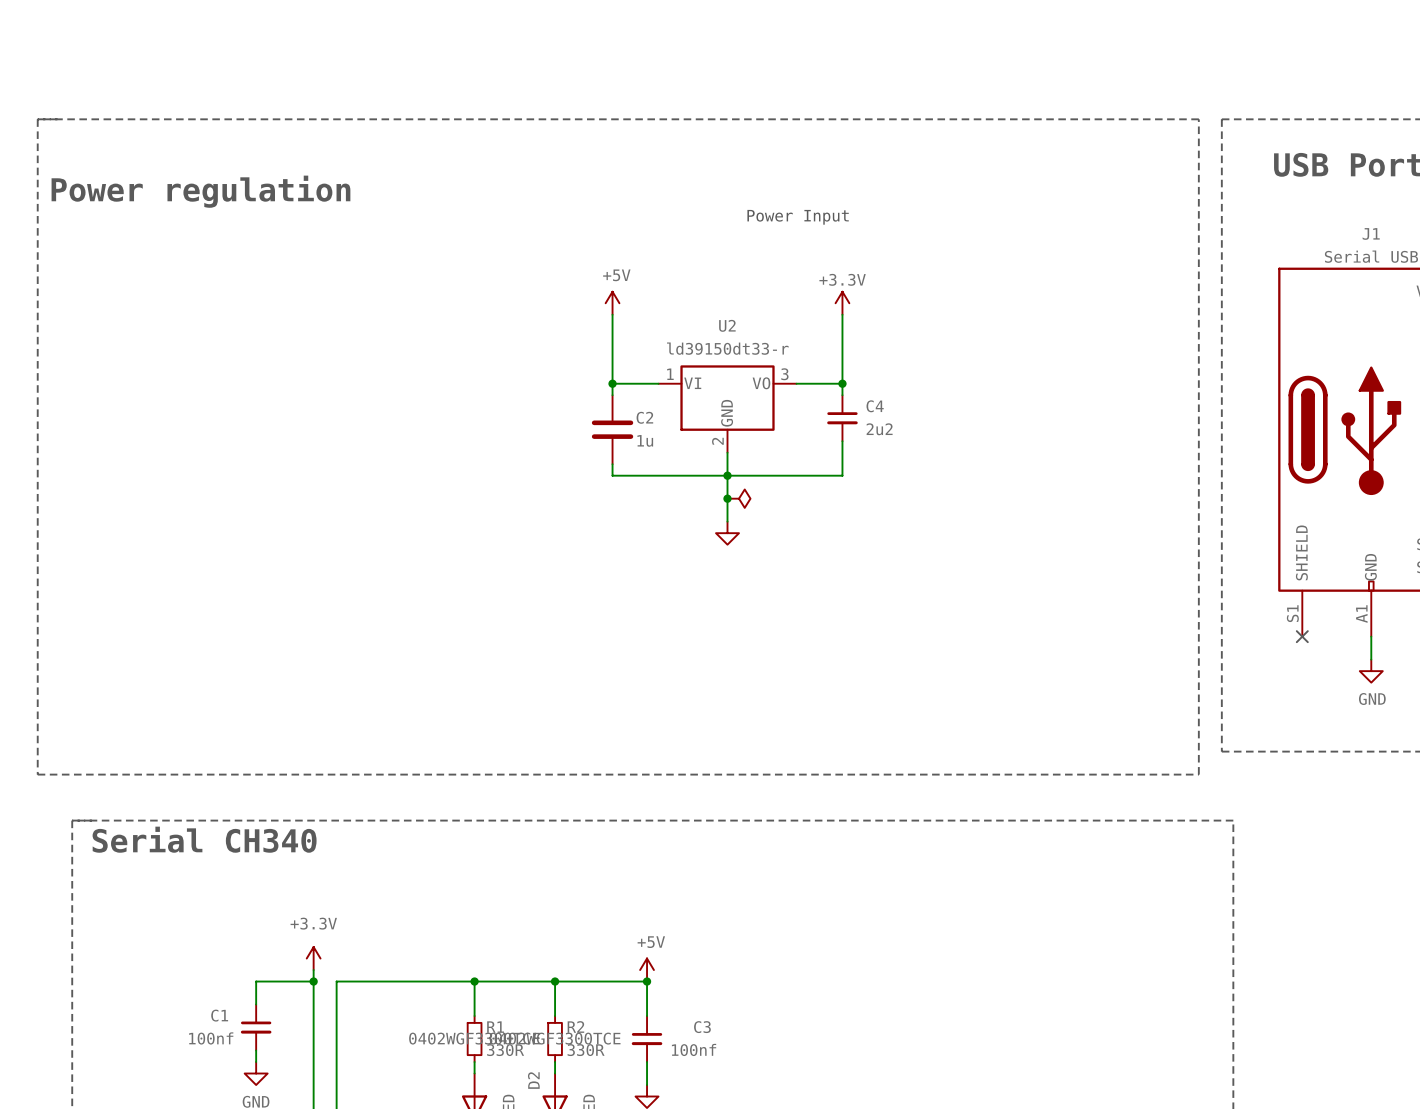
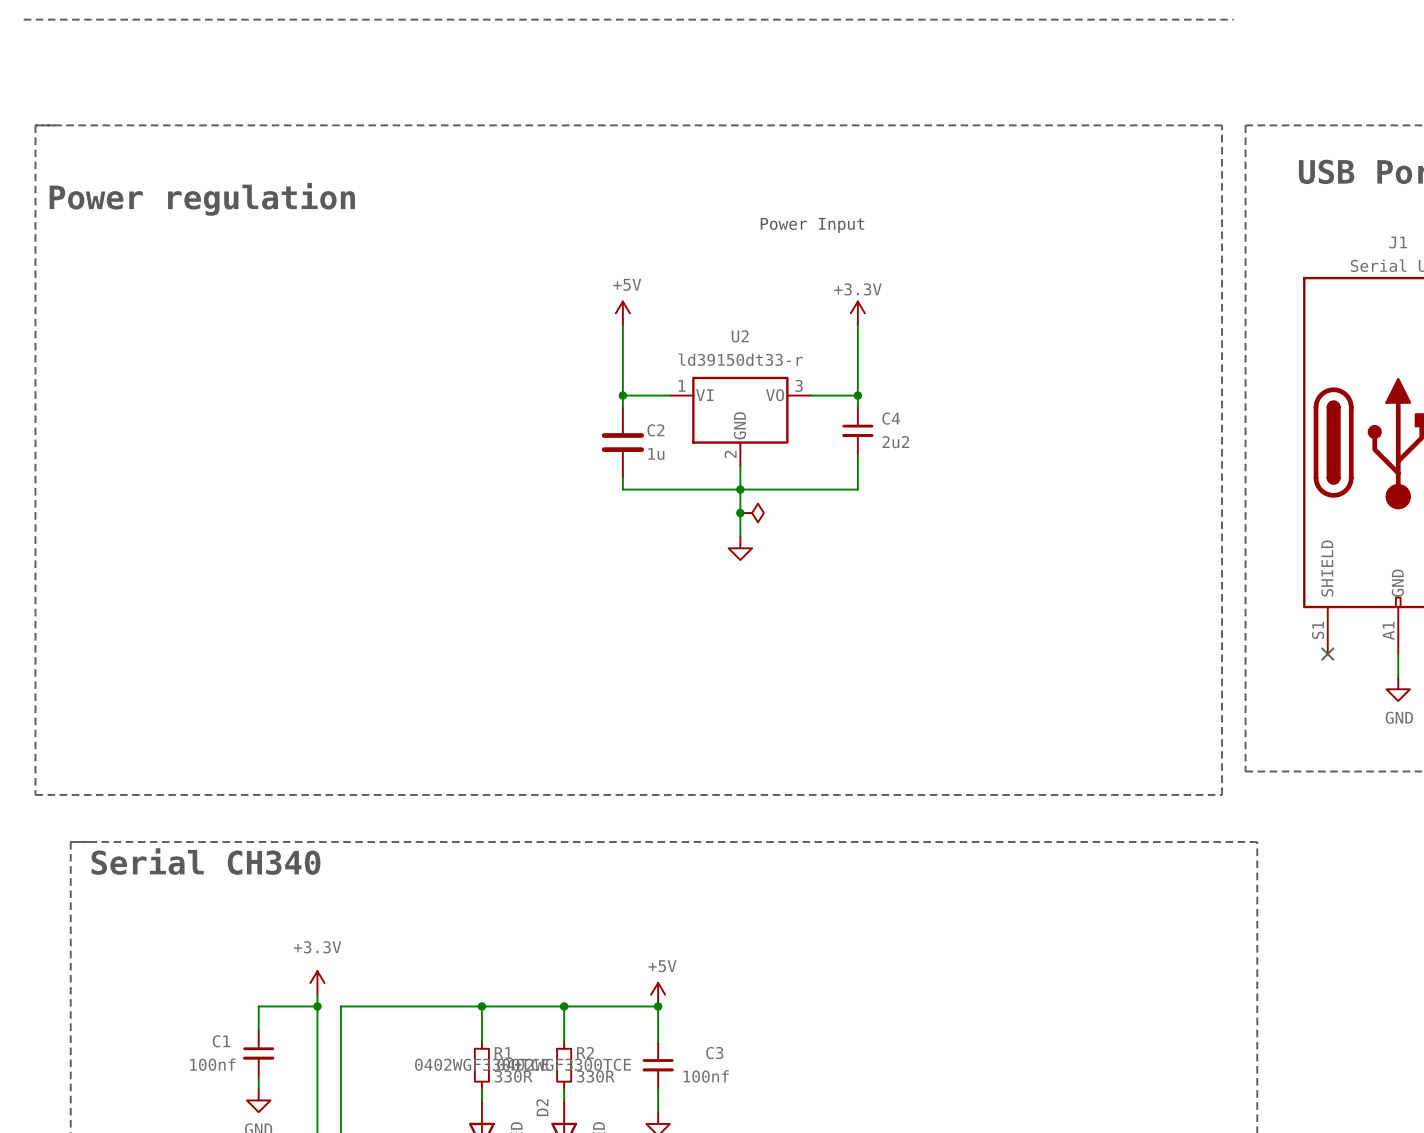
line: none -> (23, 19) (1233, 19)

